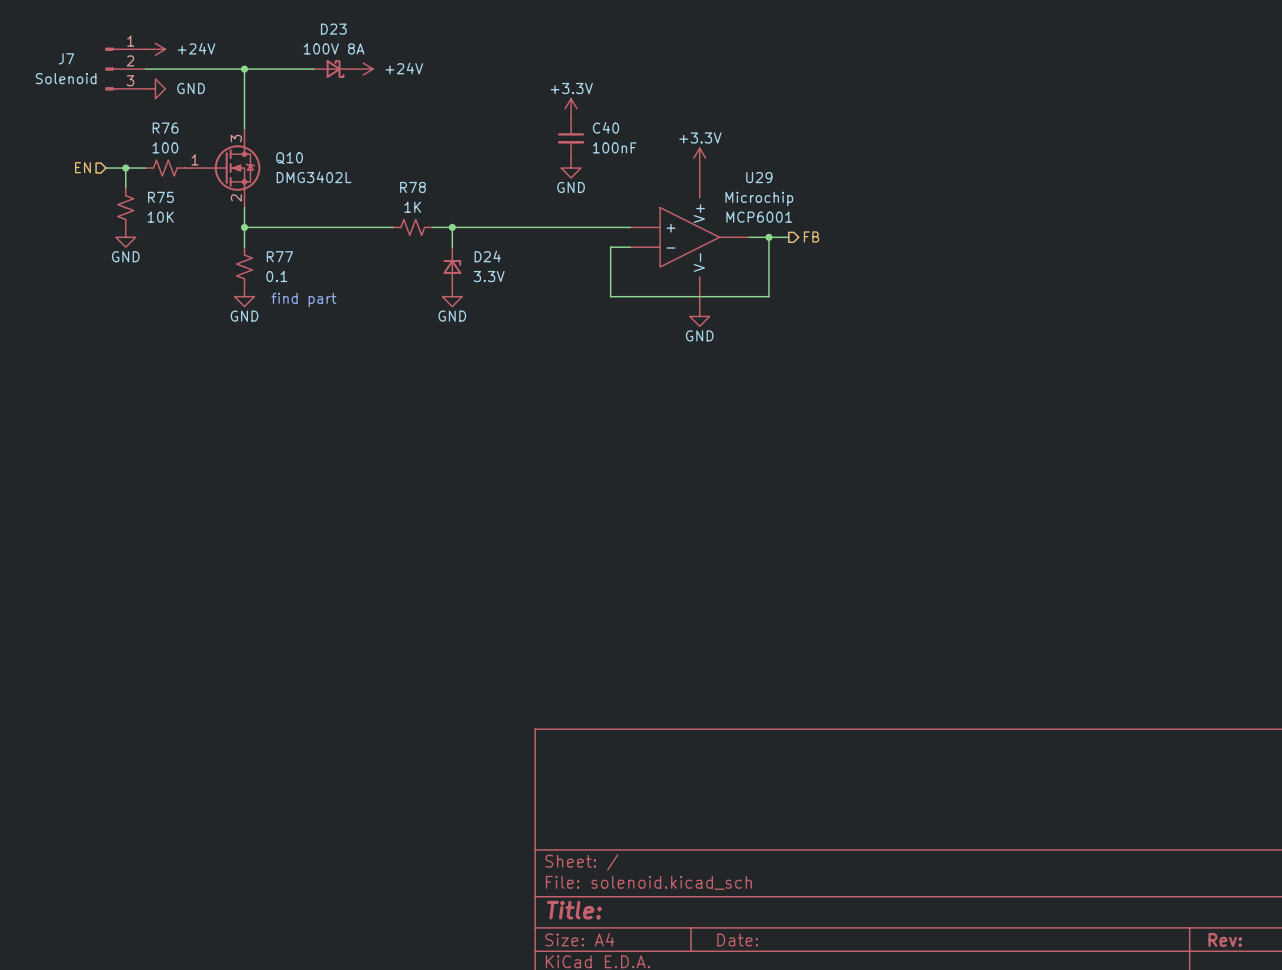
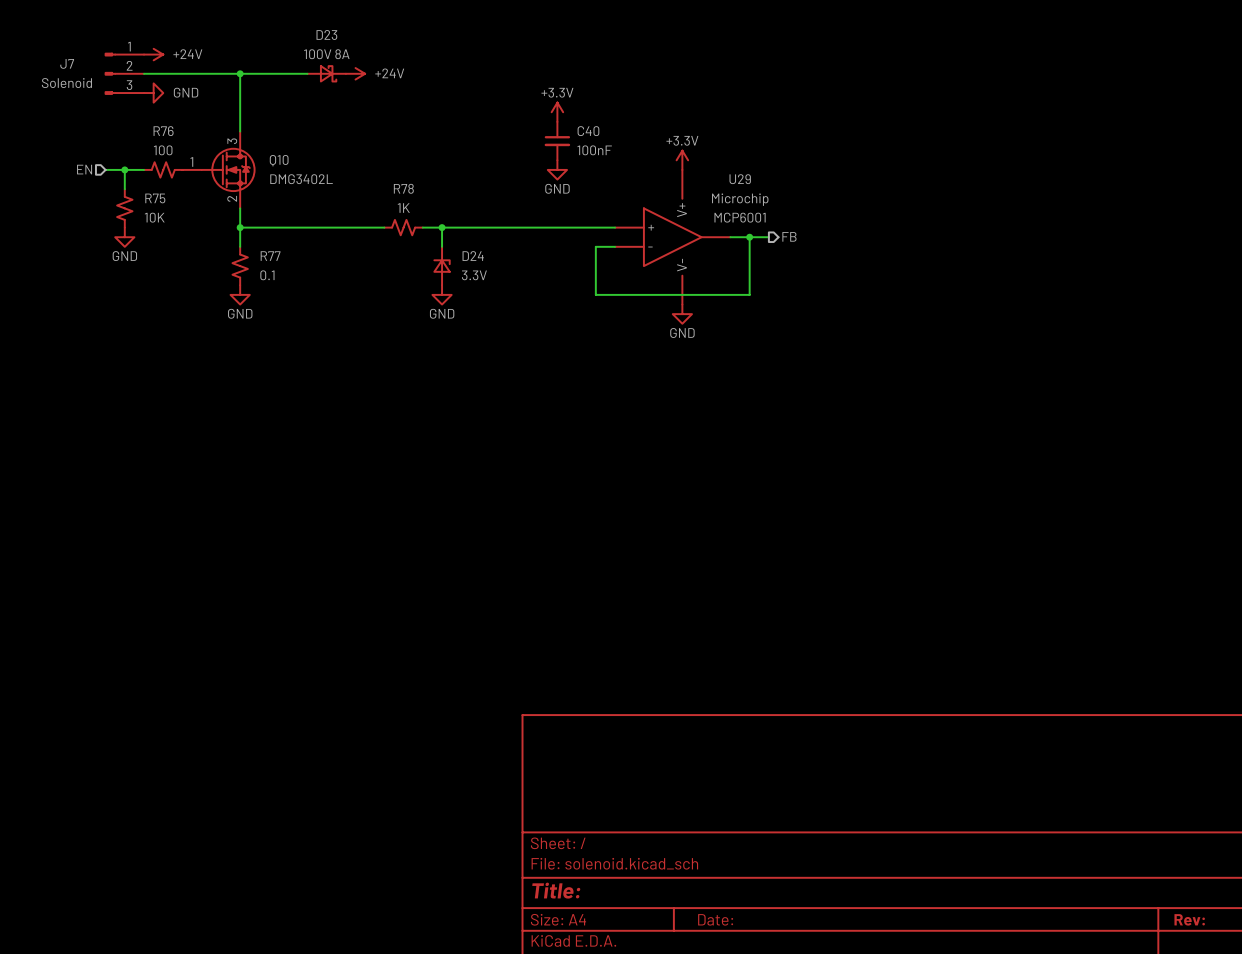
text: find part (303, 299) -> none

